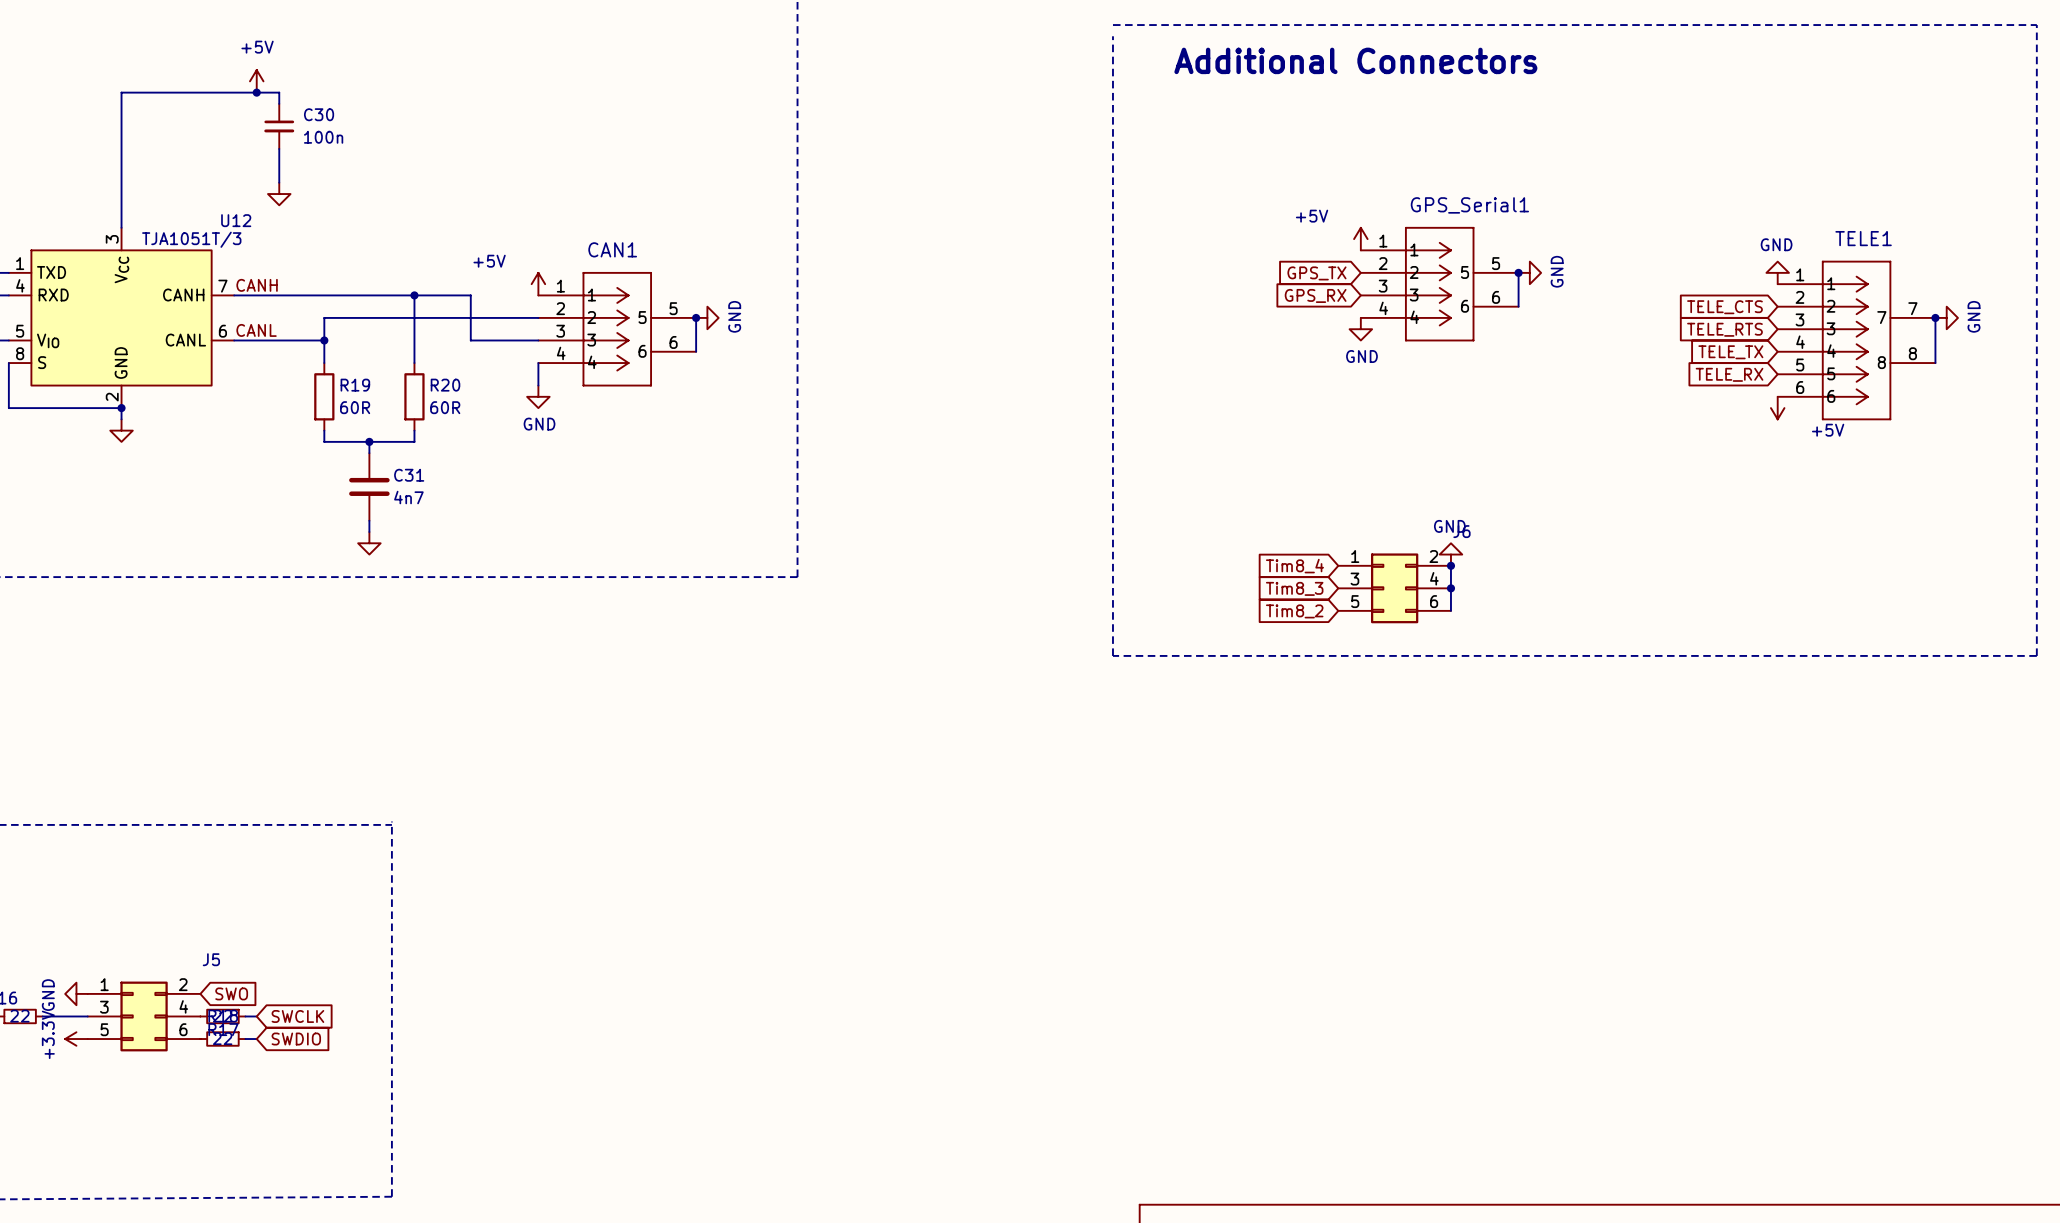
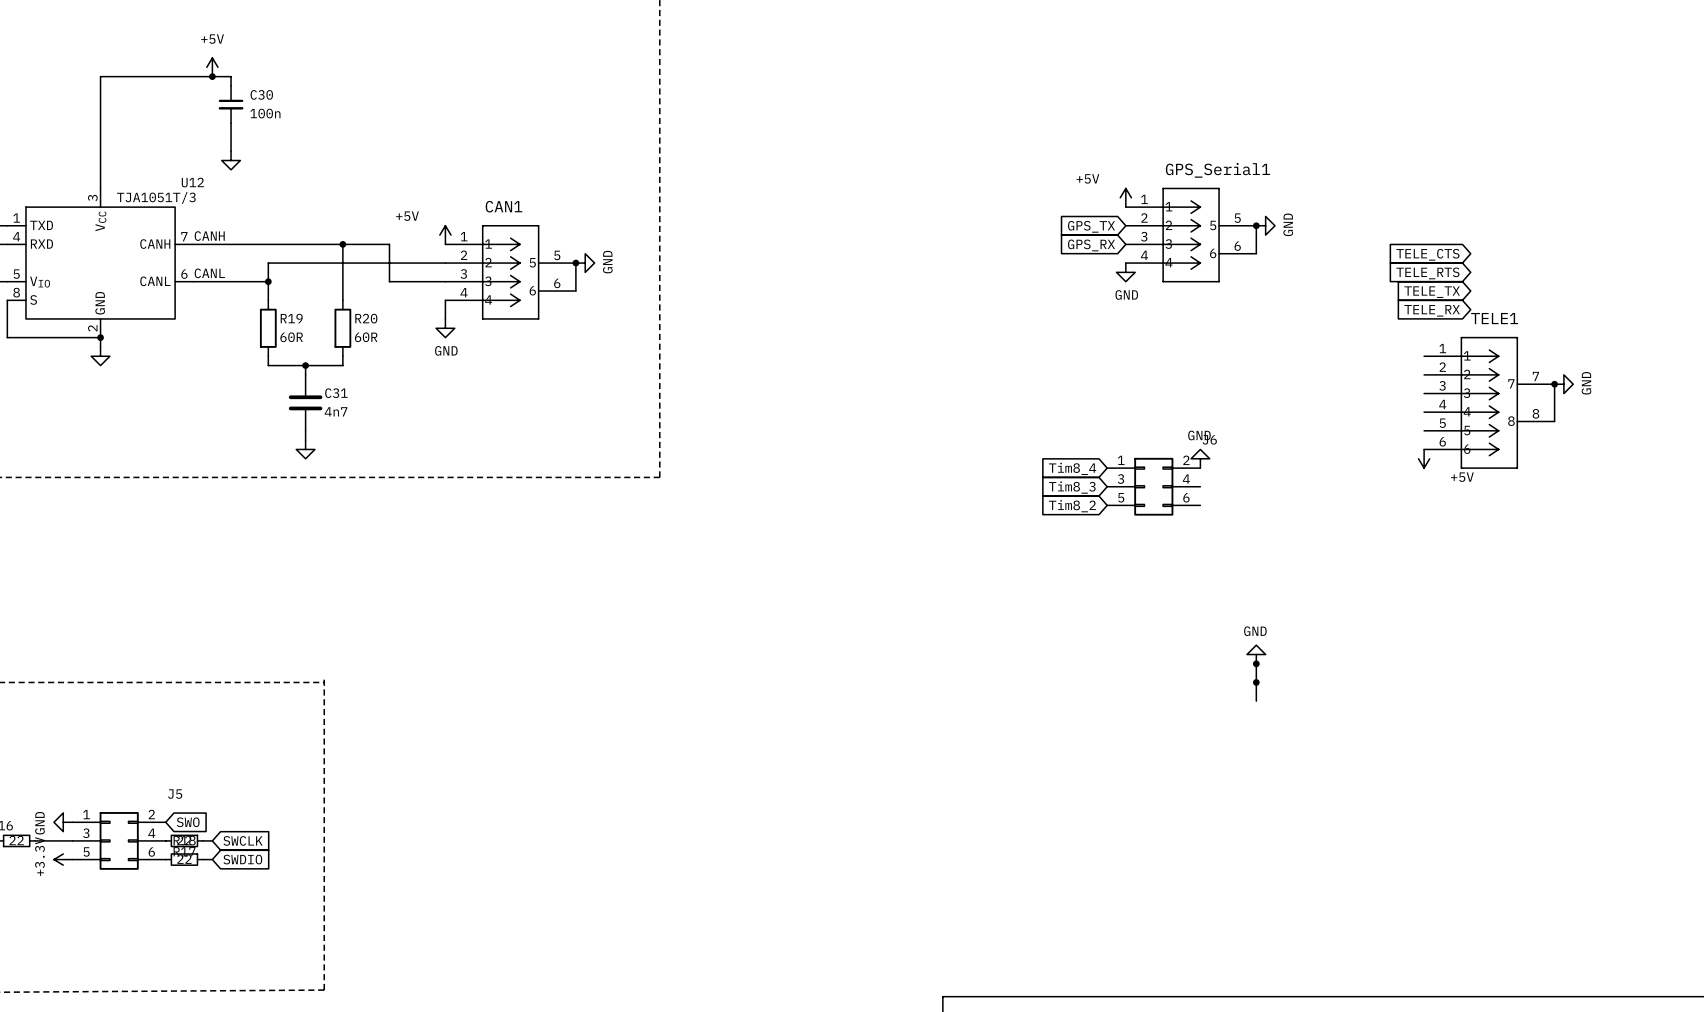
line: (1112, 25) (2036, 25) (2036, 655) (1112, 655) (1112, 36) -> none
text: Additional Connectors (1355, 60) -> none
power symbol: GND (1777, 272) -> none
wire: (1935, 317) (1935, 363) -> (1554, 384) (1554, 421)
junction: (1935, 317) -> none
power symbol: GND (1946, 317) -> none
TELE1 position: (1856, 340) -> (1489, 402)
power symbol position: +5V (1777, 408) -> +5V (1424, 458)
junction: none -> (1554, 384)
power symbol: none -> GND (1563, 384)
wire: (1450, 565) (1450, 610) -> none
junction: (1450, 565) -> none
junction: (1450, 588) -> none
power symbol: none -> GND (1256, 654)
wire: none -> (1256, 663) (1256, 701)
junction: none -> (1256, 663)
junction: none -> (1256, 682)

